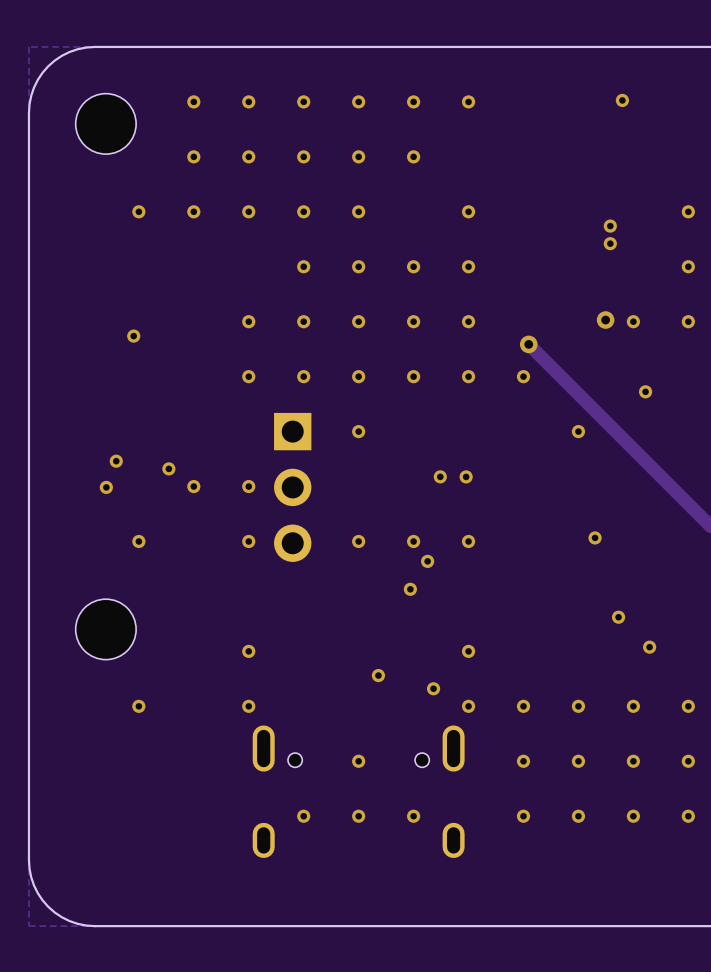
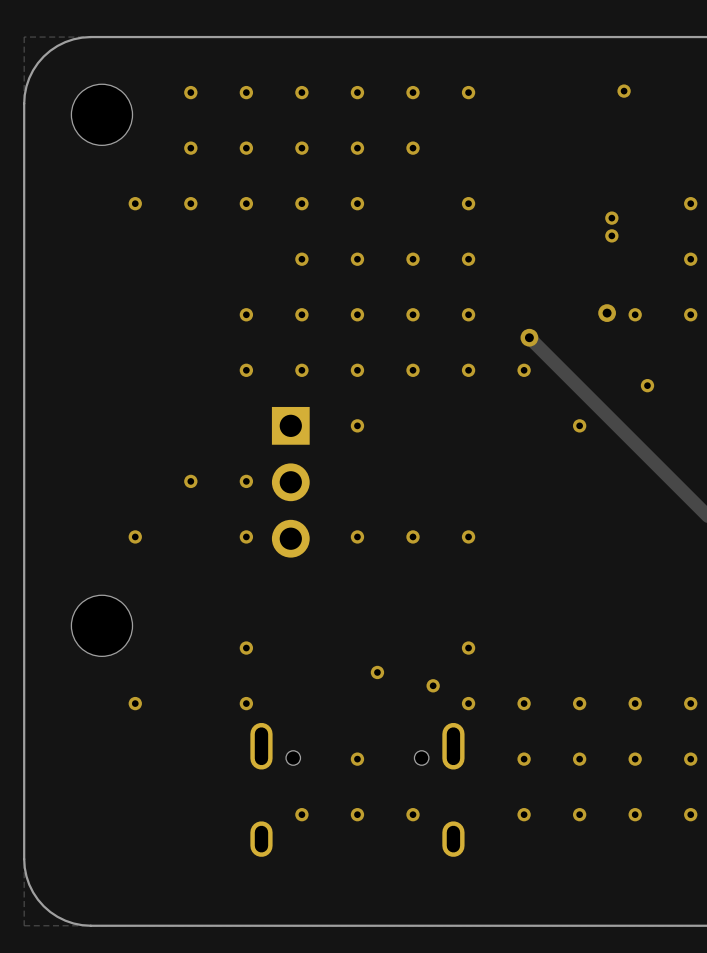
via: (133, 336) -> none
via: (116, 461) -> none
via: (168, 468) -> none
via: (440, 476) -> none
via: (466, 476) -> none
via: (106, 487) -> none
via: (595, 537) -> none
via: (427, 561) -> none
via: (410, 589) -> none
via: (618, 617) -> none
via: (649, 647) -> none

